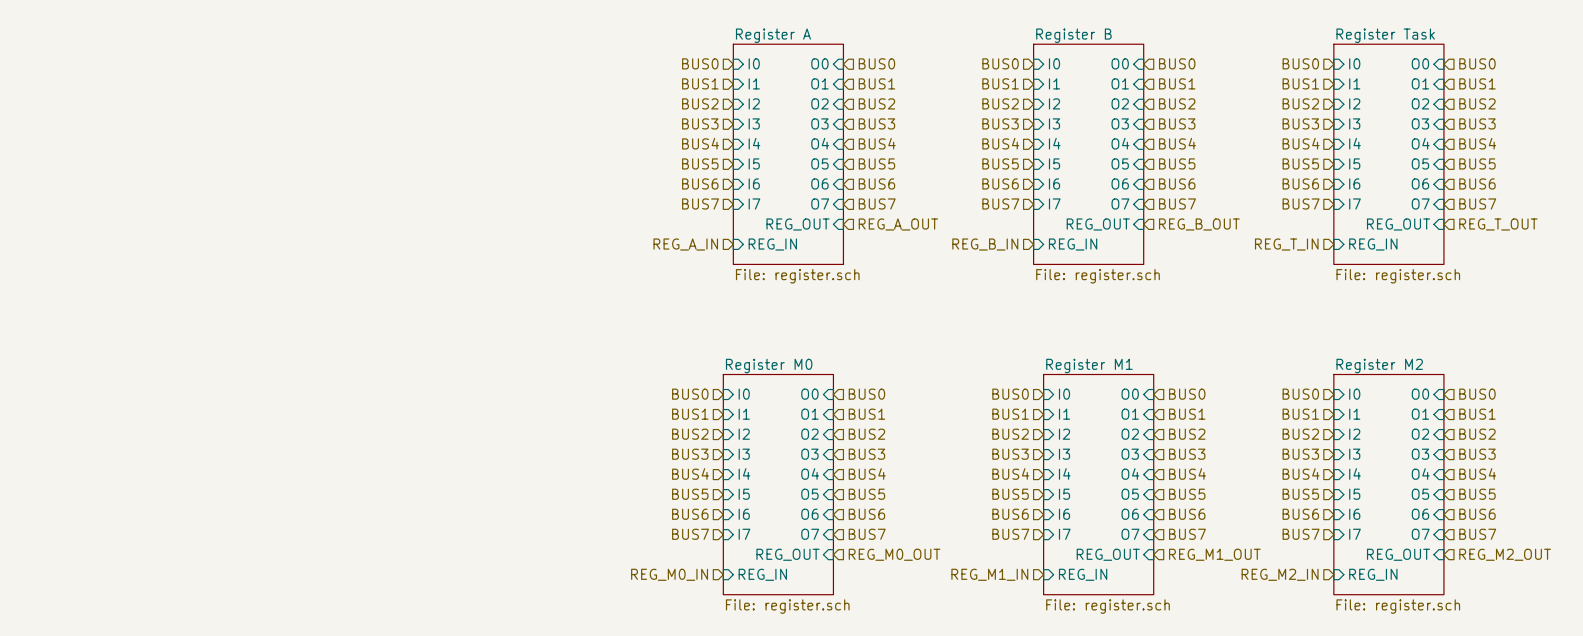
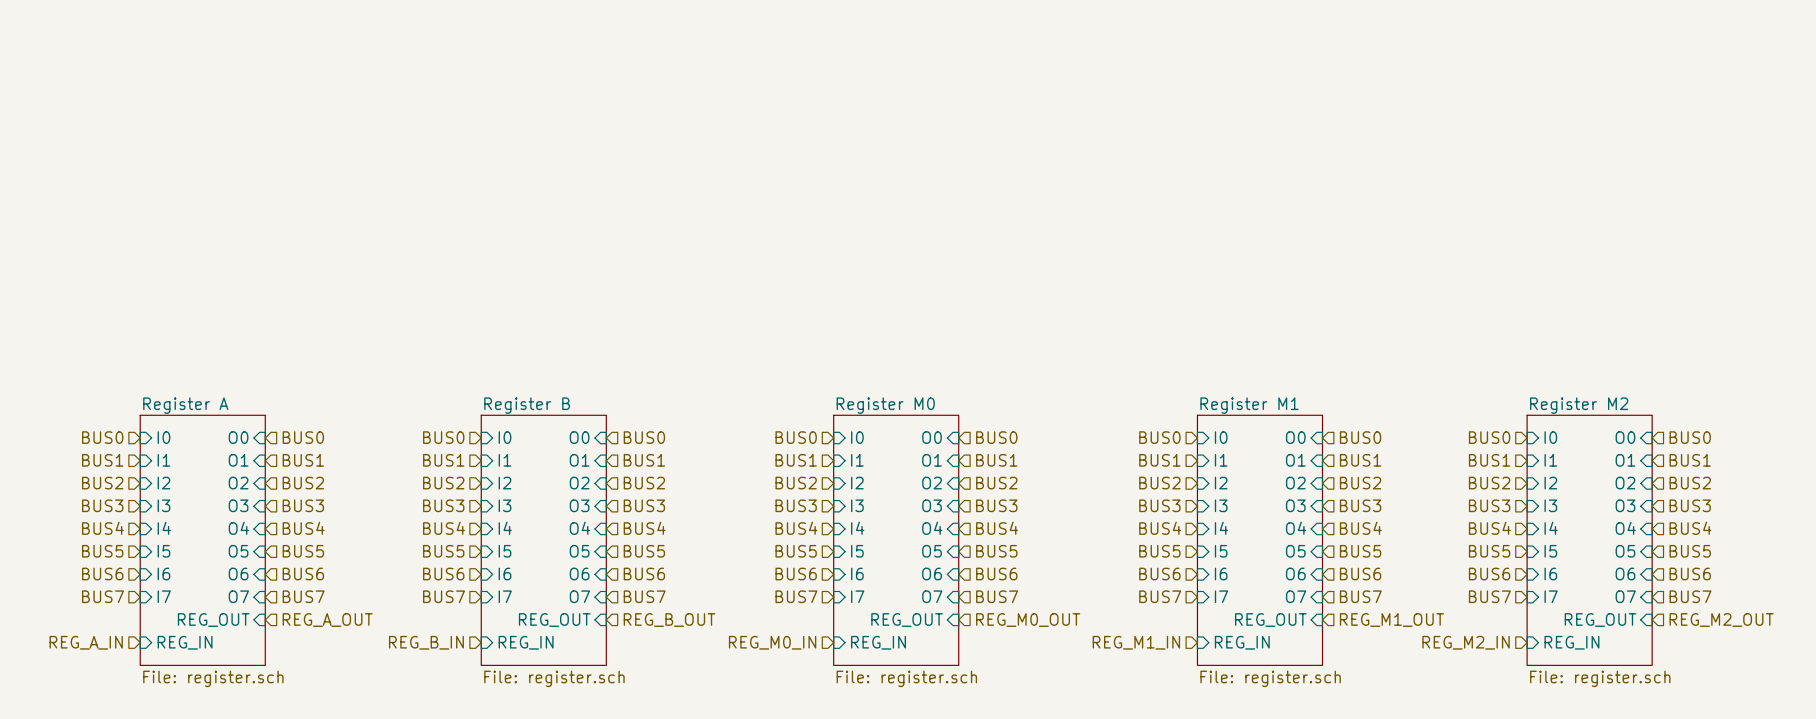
hierarchical label: BUS0 (700, 63) -> none
sheet pin: I0 (754, 63) -> none
sheet pin: O0 (819, 63) -> none
hierarchical label: BUS0 (876, 63) -> none
hierarchical label: BUS0 (1000, 63) -> none
sheet pin: I0 (1054, 63) -> none
sheet pin: O0 (1120, 63) -> none
hierarchical label: BUS0 (1177, 63) -> none
hierarchical label: BUS0 (1300, 63) -> none
sheet pin: I0 (1354, 63) -> none
sheet pin: O0 (1420, 63) -> none
hierarchical label: BUS0 (1477, 63) -> none
hierarchical label: BUS1 (700, 83) -> none
sheet pin: I1 (754, 83) -> none
sheet pin: O1 (819, 83) -> none
hierarchical label: BUS1 (876, 83) -> none
hierarchical label: BUS1 (1000, 83) -> none
sheet pin: I1 (1054, 83) -> none
sheet pin: O1 (1120, 83) -> none
hierarchical label: BUS1 (1177, 83) -> none
hierarchical label: BUS1 (1300, 83) -> none
sheet pin: I1 (1354, 83) -> none
sheet pin: O1 (1420, 83) -> none
hierarchical label: BUS1 (1477, 83) -> none
hierarchical label: BUS2 (700, 103) -> none
sheet pin: I2 (754, 103) -> none
sheet pin: O2 (819, 103) -> none
hierarchical label: BUS2 (876, 103) -> none
hierarchical label: BUS2 (1000, 103) -> none
sheet pin: I2 (1054, 103) -> none
sheet pin: O2 (1120, 103) -> none
hierarchical label: BUS2 (1177, 103) -> none
hierarchical label: BUS2 (1300, 103) -> none
sheet pin: I2 (1354, 103) -> none
sheet pin: O2 (1420, 103) -> none
hierarchical label: BUS2 (1477, 103) -> none
hierarchical label: BUS3 (700, 123) -> none
sheet pin: I3 (754, 123) -> none
sheet pin: O3 (819, 123) -> none
hierarchical label: BUS3 (876, 123) -> none
hierarchical label: BUS3 (1000, 123) -> none
sheet pin: I3 (1054, 123) -> none
sheet pin: O3 (1120, 123) -> none
hierarchical label: BUS3 (1177, 123) -> none
hierarchical label: BUS3 (1300, 123) -> none
sheet pin: I3 (1354, 123) -> none
sheet pin: O3 (1420, 123) -> none
hierarchical label: BUS3 (1477, 123) -> none
hierarchical label: BUS4 (700, 143) -> none
sheet pin: I4 (754, 143) -> none
sheet pin: O4 (820, 143) -> none
hierarchical label: BUS4 (877, 143) -> none
hierarchical label: BUS4 (1000, 143) -> none
sheet pin: I4 (1054, 143) -> none
sheet pin: O4 (1120, 143) -> none
hierarchical label: BUS4 (1177, 143) -> none
hierarchical label: BUS4 (1301, 143) -> none
sheet pin: I4 (1354, 143) -> none
sheet pin: O4 (1420, 143) -> none
hierarchical label: BUS4 (1477, 143) -> none
sheet Register A: File: register.sch (788, 154) -> none
sheet Register B: File: register.sch (1088, 154) -> none
sheet Register Task: File: register.sch (1388, 154) -> none
hierarchical label: BUS5 (700, 163) -> none
sheet pin: I5 (754, 163) -> none
sheet pin: O5 (819, 163) -> none
hierarchical label: BUS5 (876, 163) -> none
hierarchical label: BUS5 (1000, 163) -> none
sheet pin: I5 (1054, 163) -> none
sheet pin: O5 (1120, 163) -> none
hierarchical label: BUS5 (1177, 163) -> none
hierarchical label: BUS5 (1300, 163) -> none
sheet pin: I5 (1354, 163) -> none
sheet pin: O5 (1420, 163) -> none
hierarchical label: BUS5 (1477, 163) -> none
hierarchical label: BUS6 (700, 183) -> none
sheet pin: I6 (754, 183) -> none
sheet pin: O6 (819, 183) -> none
hierarchical label: BUS6 (876, 183) -> none
hierarchical label: BUS6 (1000, 183) -> none
sheet pin: I6 (1054, 183) -> none
sheet pin: O6 (1120, 183) -> none
hierarchical label: BUS6 (1177, 183) -> none
hierarchical label: BUS6 (1300, 183) -> none
sheet pin: I6 (1354, 183) -> none
sheet pin: O6 (1420, 183) -> none
hierarchical label: BUS6 (1477, 183) -> none
hierarchical label: BUS7 (700, 203) -> none
sheet pin: I7 (754, 203) -> none
sheet pin: O7 (820, 203) -> none
hierarchical label: BUS7 (877, 203) -> none
hierarchical label: BUS7 (1000, 203) -> none
sheet pin: I7 (1054, 203) -> none
sheet pin: O7 (1120, 203) -> none
hierarchical label: BUS7 (1177, 203) -> none
hierarchical label: BUS7 (1301, 203) -> none
sheet pin: I7 (1354, 203) -> none
sheet pin: O7 (1420, 203) -> none
hierarchical label: BUS7 (1477, 203) -> none
sheet pin: REG_OUT (798, 224) -> none
hierarchical label: REG_A_OUT (898, 224) -> none
sheet pin: REG_OUT (1098, 224) -> none
hierarchical label: REG_B_OUT (1199, 224) -> none
sheet pin: REG_OUT (1398, 224) -> none
hierarchical label: REG_T_OUT (1498, 224) -> none
hierarchical label: REG_A_IN (685, 244) -> none
sheet pin: REG_IN (772, 244) -> none
hierarchical label: REG_B_IN (985, 244) -> none
sheet pin: REG_IN (1073, 244) -> none
hierarchical label: REG_T_IN (1286, 244) -> none
sheet pin: REG_IN (1373, 244) -> none
hierarchical label: none -> BUS0 (102, 437)
sheet pin: none -> I0 (163, 437)
sheet pin: none -> O0 (238, 437)
hierarchical label: none -> BUS0 (303, 437)
hierarchical label: none -> BUS0 (443, 437)
sheet pin: none -> I0 (505, 437)
sheet pin: none -> O0 (579, 437)
hierarchical label: none -> BUS0 (644, 437)
hierarchical label: none -> BUS1 (102, 460)
sheet pin: none -> I1 (163, 460)
sheet pin: none -> O1 (238, 460)
hierarchical label: none -> BUS1 (303, 460)
hierarchical label: none -> BUS1 (443, 460)
sheet pin: none -> I1 (505, 460)
sheet pin: none -> O1 (579, 460)
hierarchical label: none -> BUS1 (644, 460)
hierarchical label: none -> BUS2 (102, 483)
sheet pin: none -> I2 (163, 483)
sheet pin: none -> O2 (238, 483)
hierarchical label: none -> BUS2 (303, 483)
hierarchical label: none -> BUS2 (443, 483)
sheet pin: none -> I2 (505, 483)
sheet pin: none -> O2 (579, 483)
hierarchical label: none -> BUS2 (644, 483)
hierarchical label: none -> BUS3 (102, 505)
sheet pin: none -> I3 (163, 505)
sheet pin: none -> O3 (238, 505)
hierarchical label: none -> BUS3 (303, 505)
hierarchical label: none -> BUS3 (443, 505)
sheet pin: none -> I3 (505, 505)
sheet pin: none -> O3 (579, 505)
hierarchical label: none -> BUS3 (644, 505)
hierarchical label: none -> BUS4 (102, 528)
sheet pin: none -> I4 (164, 528)
sheet pin: none -> O4 (238, 528)
hierarchical label: none -> BUS4 (303, 528)
hierarchical label: none -> BUS4 (444, 528)
sheet pin: none -> I4 (505, 528)
sheet pin: none -> O4 (579, 528)
hierarchical label: none -> BUS4 (644, 528)
sheet Register A: none -> File: register.sch (202, 540)
sheet Register B: none -> File: register.sch (543, 540)
hierarchical label: none -> BUS5 (102, 551)
sheet pin: none -> I5 (163, 551)
sheet pin: none -> O5 (238, 551)
hierarchical label: none -> BUS5 (303, 551)
hierarchical label: none -> BUS5 (443, 551)
sheet pin: none -> I5 (505, 551)
sheet pin: none -> O5 (579, 551)
hierarchical label: none -> BUS5 (644, 551)
hierarchical label: none -> BUS6 (102, 574)
sheet pin: none -> I6 (163, 574)
sheet pin: none -> O6 (238, 574)
hierarchical label: none -> BUS6 (303, 574)
hierarchical label: none -> BUS6 (443, 574)
sheet pin: none -> I6 (505, 574)
sheet pin: none -> O6 (579, 574)
hierarchical label: none -> BUS6 (644, 574)
hierarchical label: none -> BUS7 (102, 596)
sheet pin: none -> I7 (164, 596)
sheet pin: none -> O7 (238, 596)
hierarchical label: none -> BUS7 (303, 596)
hierarchical label: none -> BUS7 (444, 596)
sheet pin: none -> I7 (505, 596)
sheet pin: none -> O7 (579, 596)
hierarchical label: none -> BUS7 (644, 596)
sheet pin: none -> REG_OUT (213, 620)
hierarchical label: none -> REG_A_OUT (327, 620)
sheet pin: none -> REG_OUT (554, 620)
hierarchical label: none -> REG_B_OUT (669, 620)
hierarchical label: none -> REG_A_IN (86, 642)
sheet pin: none -> REG_IN (185, 642)
hierarchical label: none -> REG_B_IN (426, 642)
sheet pin: none -> REG_IN (526, 642)

